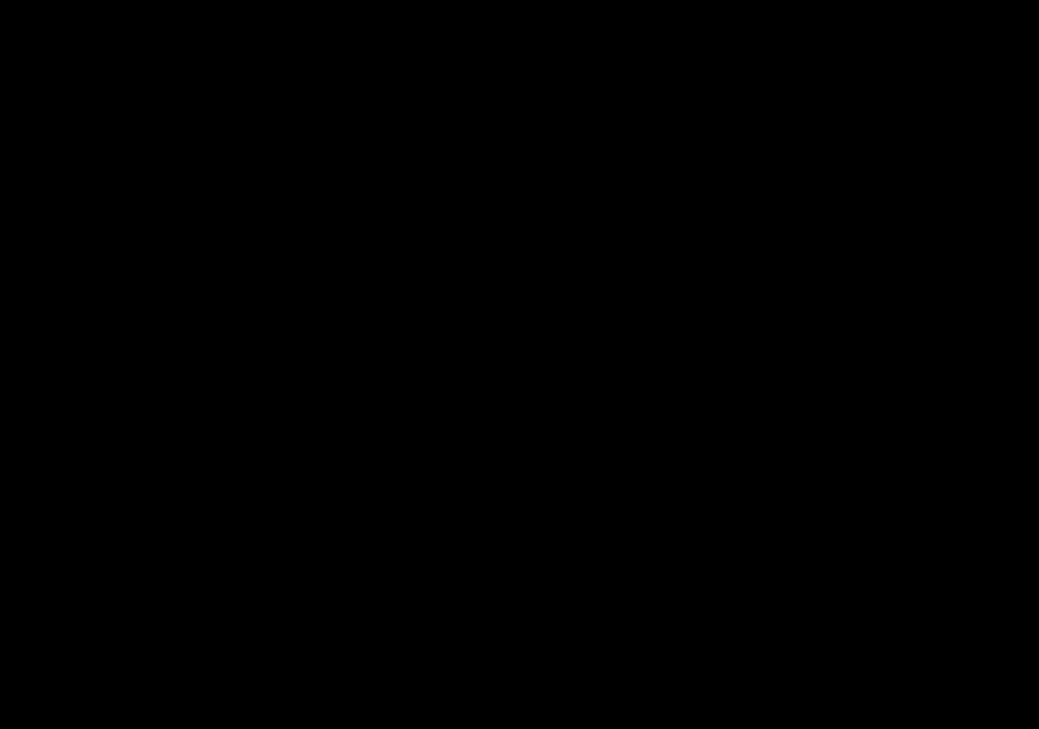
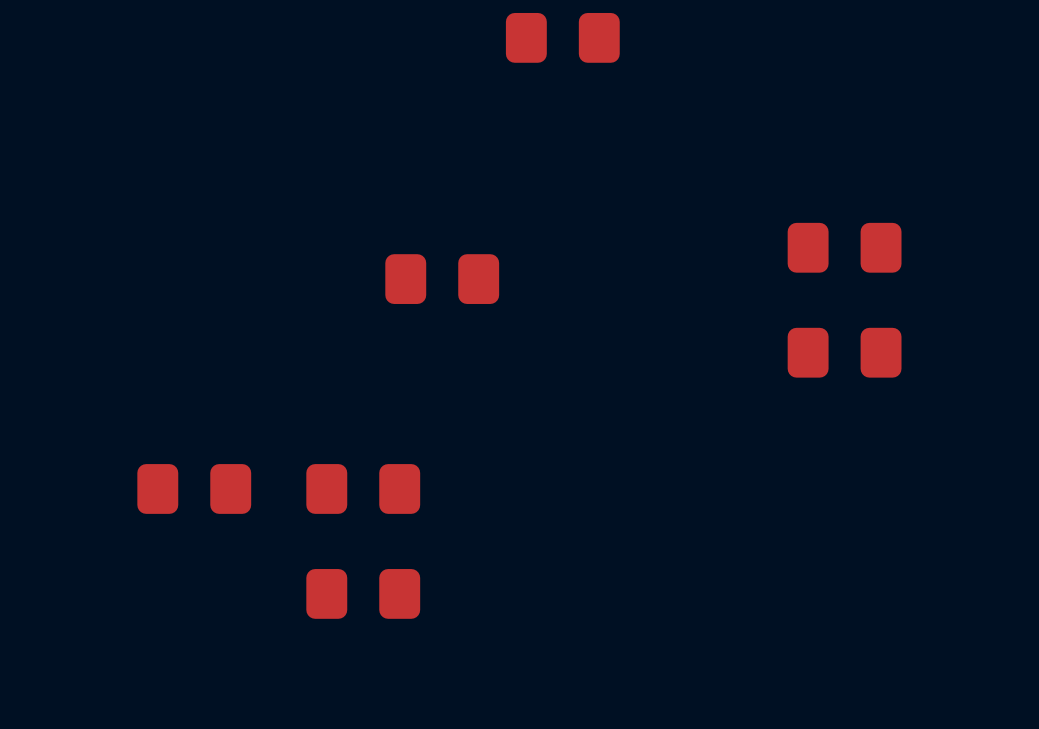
part: none -> (562, 37)
part: none -> (844, 247)
part: none -> (442, 279)
part: none -> (844, 352)
part: none -> (194, 488)
part: none -> (363, 488)
part: none -> (363, 593)

